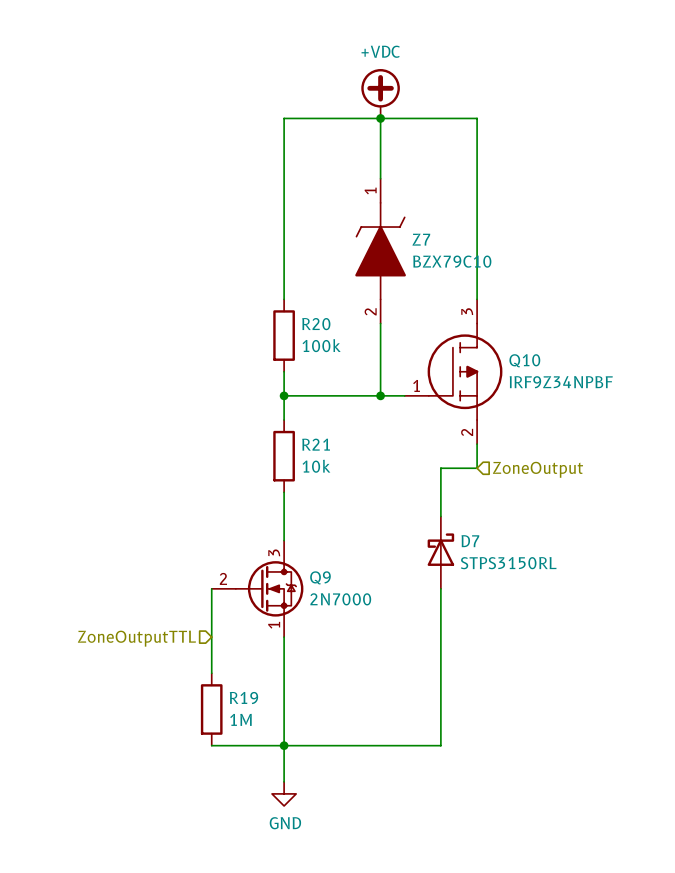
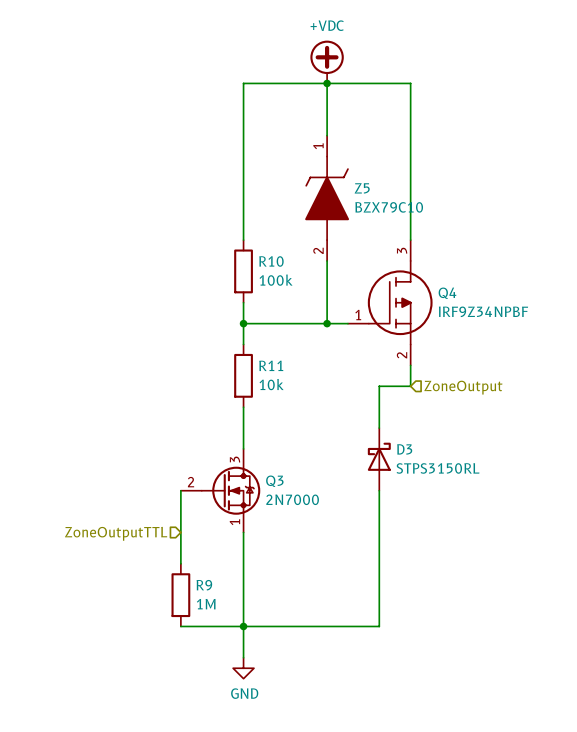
Z7 name: Z7 (421, 239) -> Z5 (362, 188)
R20 name: R20 (316, 324) -> R10 (271, 261)
Q10 name: Q10 (524, 360) -> Q4 (447, 293)
R21 name: R21 (316, 444) -> R11 (271, 365)
D7 name: D7 (470, 541) -> D3 (404, 449)
Q9 name: Q9 (320, 577) -> Q3 (274, 481)
R19 name: R19 (243, 698) -> R9 (204, 585)

